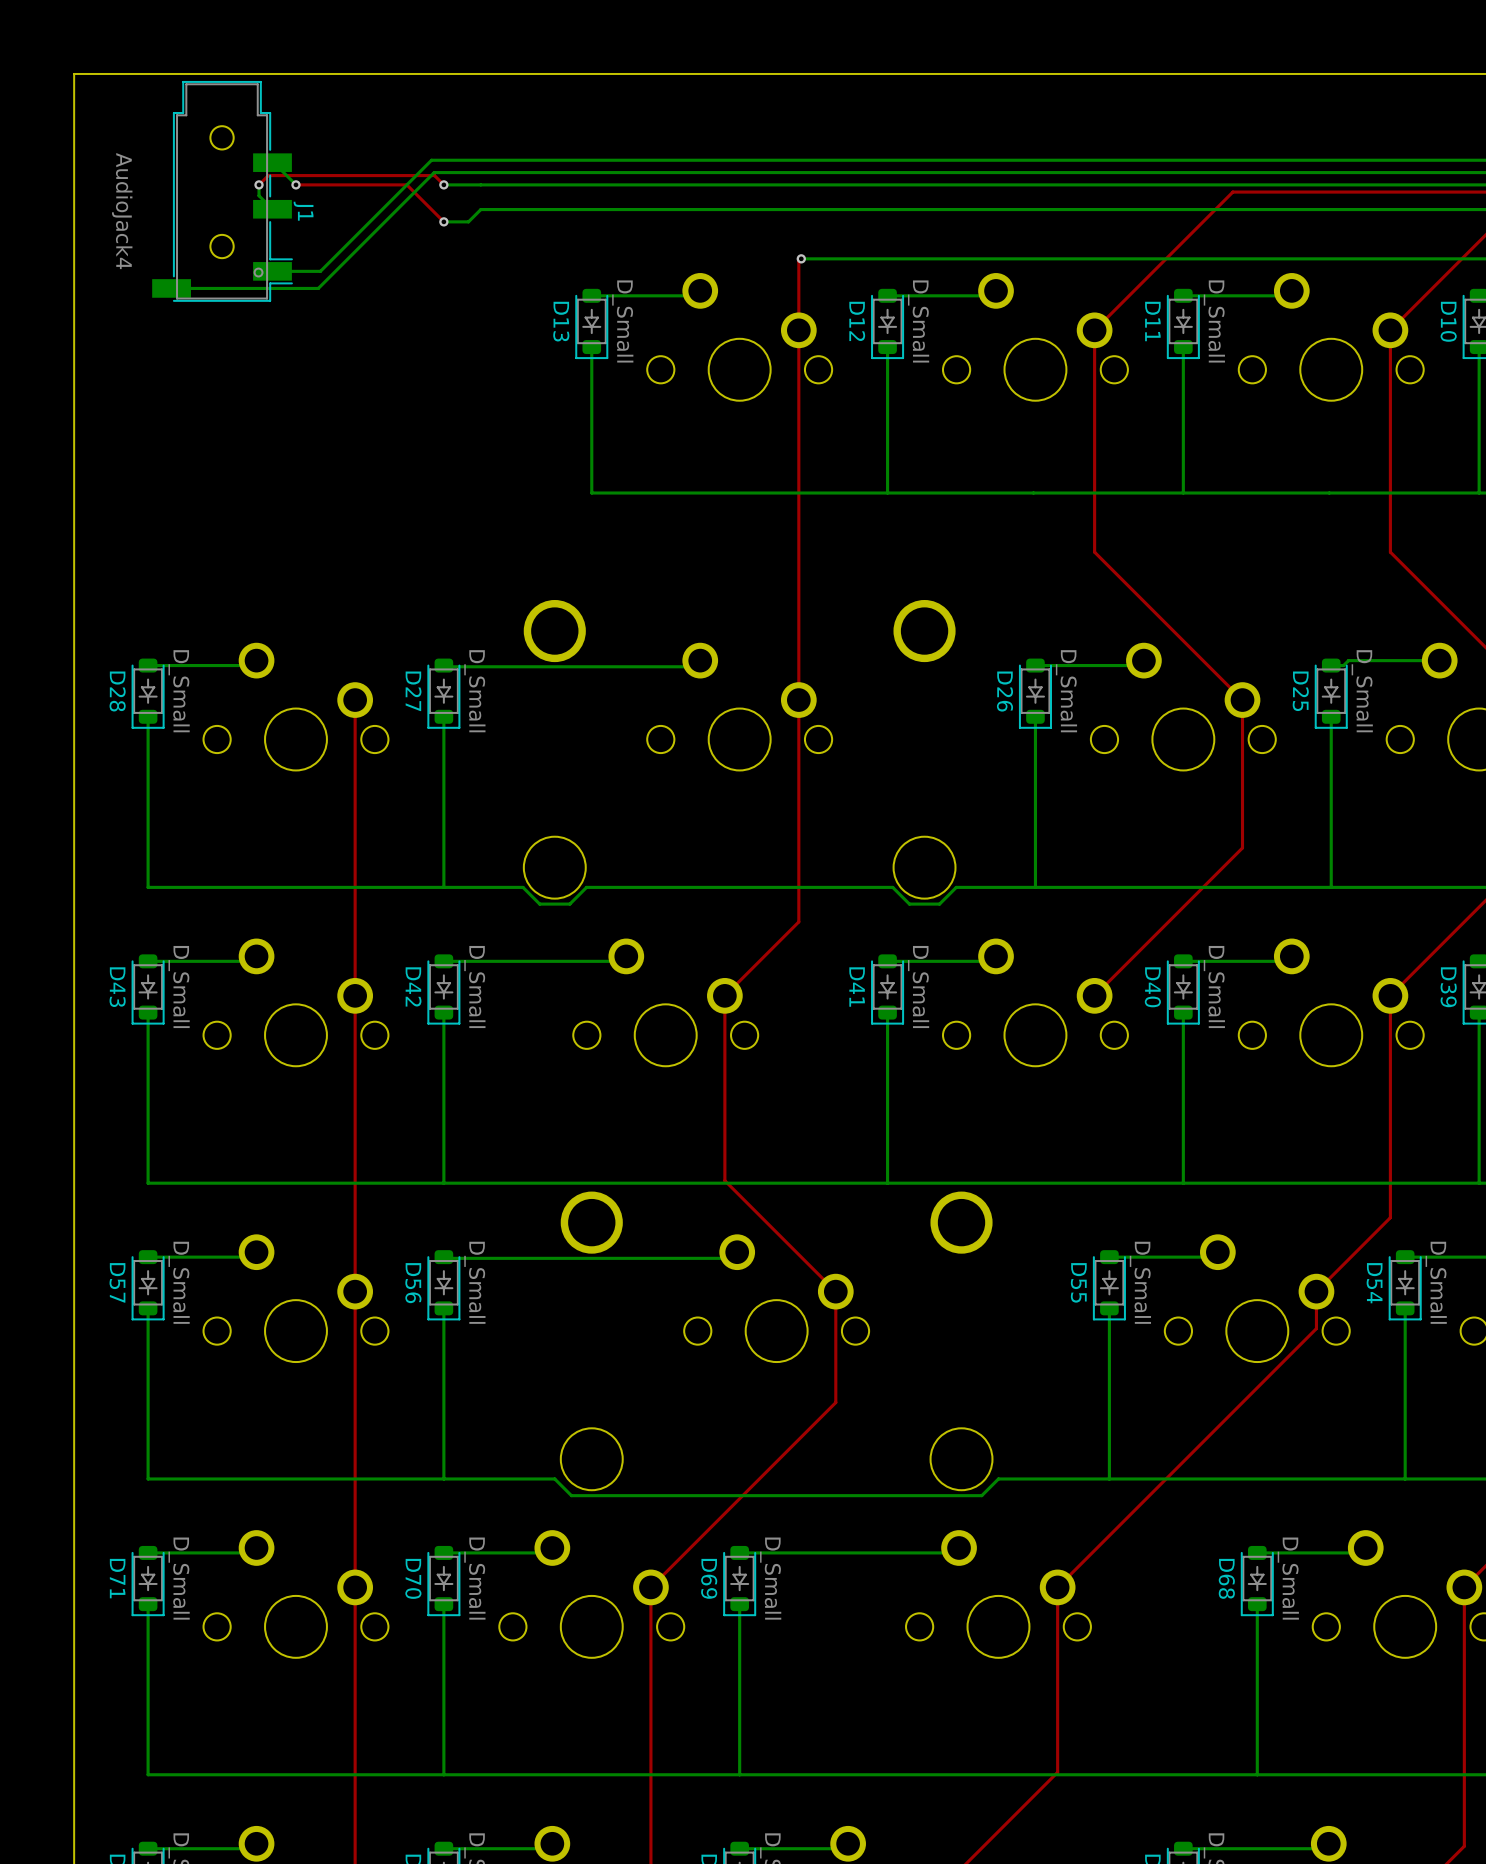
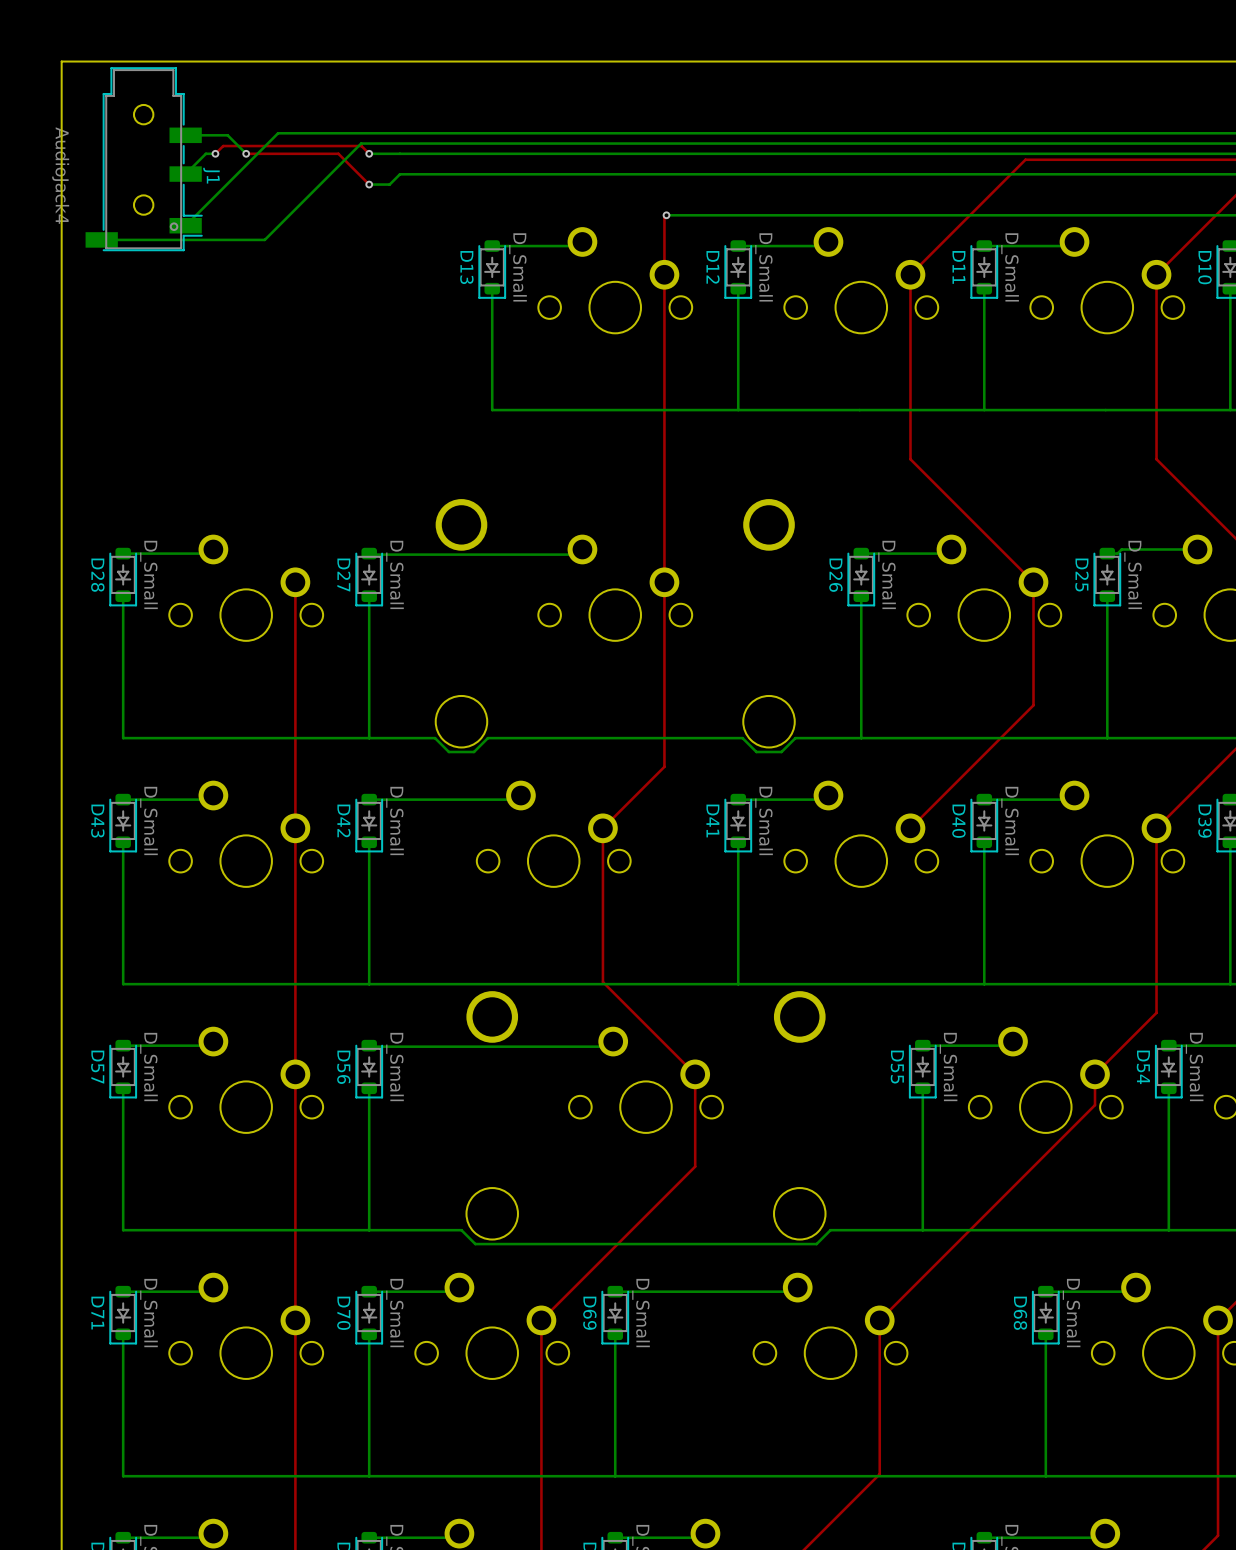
bottom track: (431, 160) (320, 271) (272, 271) -> (358, 133) (278, 133) (185, 225)
bottom track: none -> (226, 135) (185, 135)
bottom track: (259, 184) (259, 195) (272, 209) -> (215, 153) (205, 153) (185, 174)
J1 position: (222, 191) -> (144, 159)
bottom track: none -> (142, 239) (101, 239)

